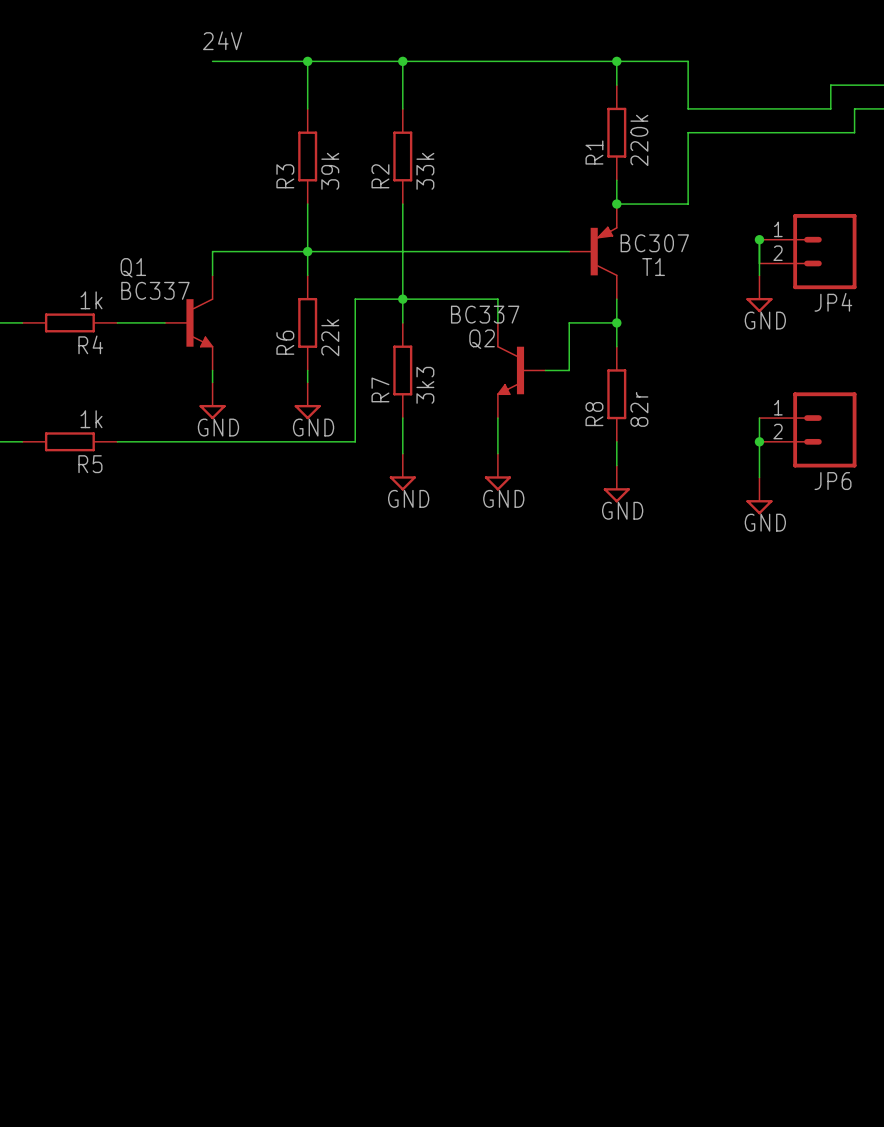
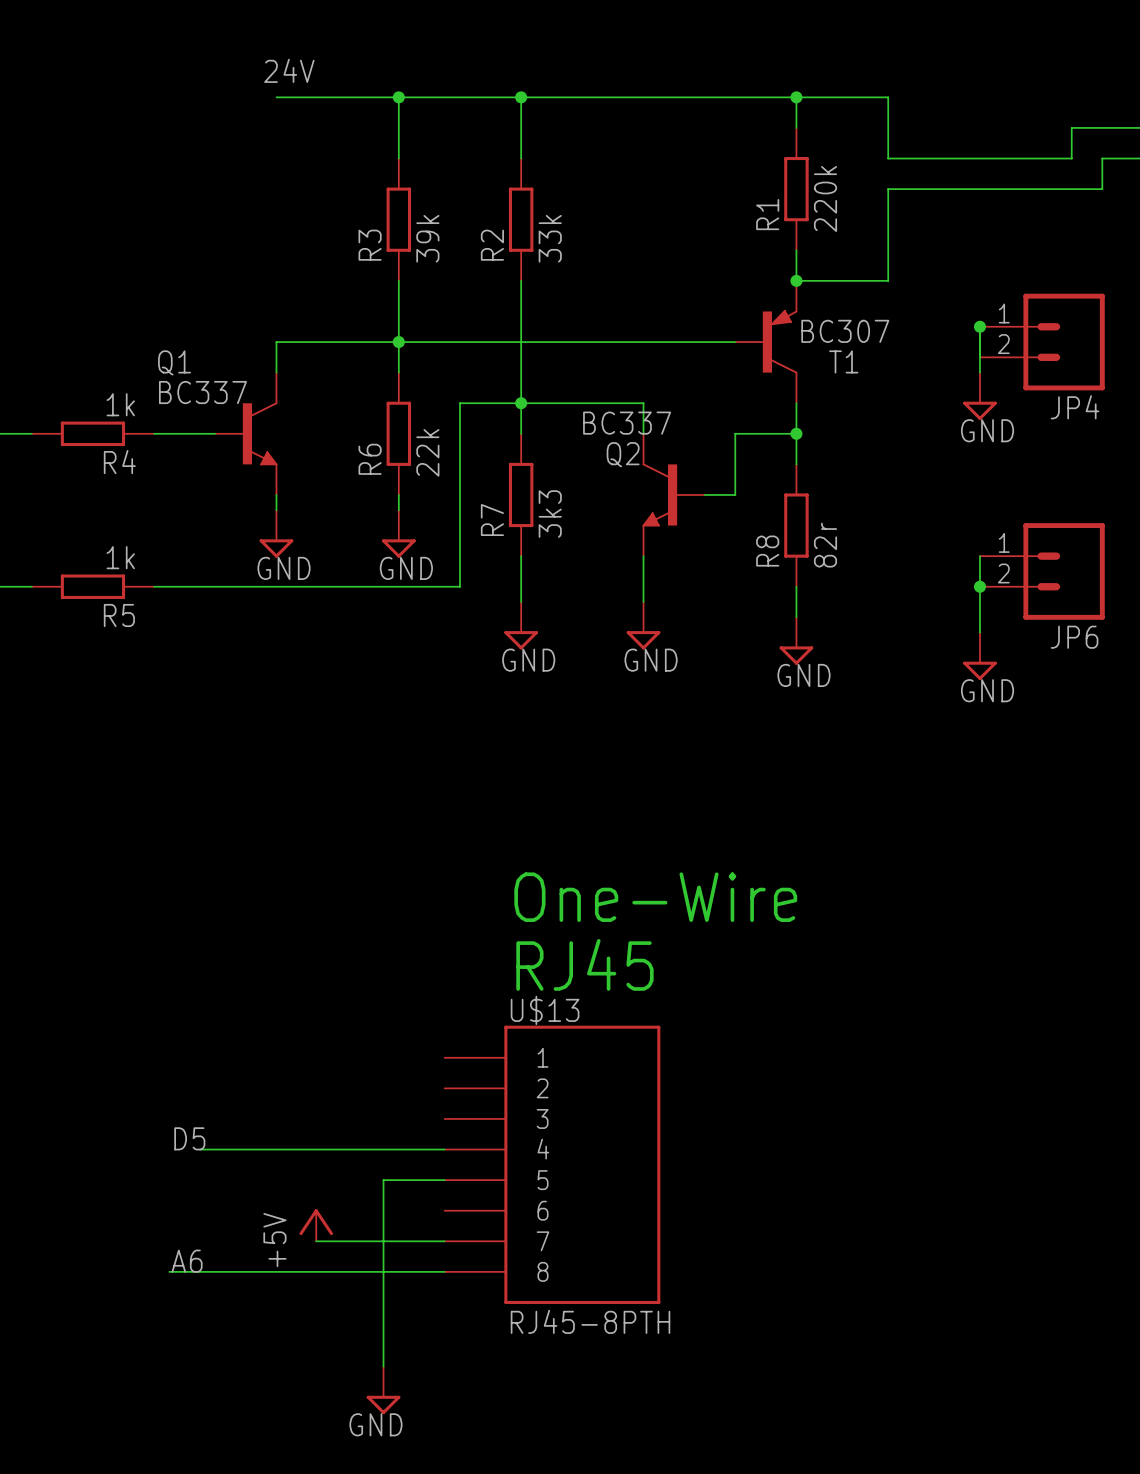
text: none -> One-Wire (655, 897)
text: none -> RJ45 (584, 964)
label: none -> D5 (189, 1138)
wire: none -> (200, 1149) (444, 1149)
U$13: none -> RJ45-8PTH (552, 1164)
wire: none -> (444, 1180) (383, 1180) (383, 1366)
power symbol: none -> +5V (316, 1225)
wire: none -> (316, 1241) (444, 1241)
label: none -> A6 (187, 1261)
wire: none -> (169, 1271) (444, 1271)
power symbol: none -> GND (383, 1390)

